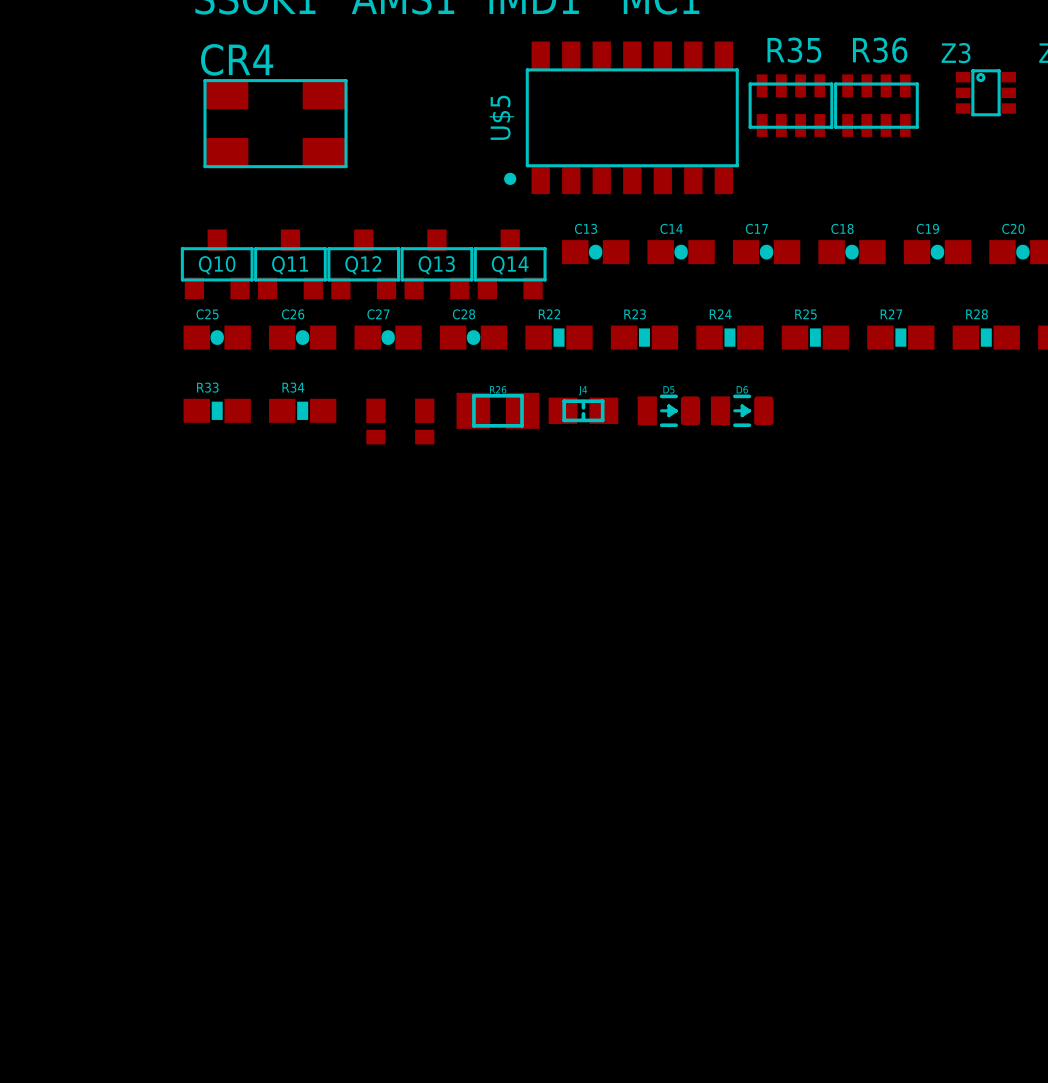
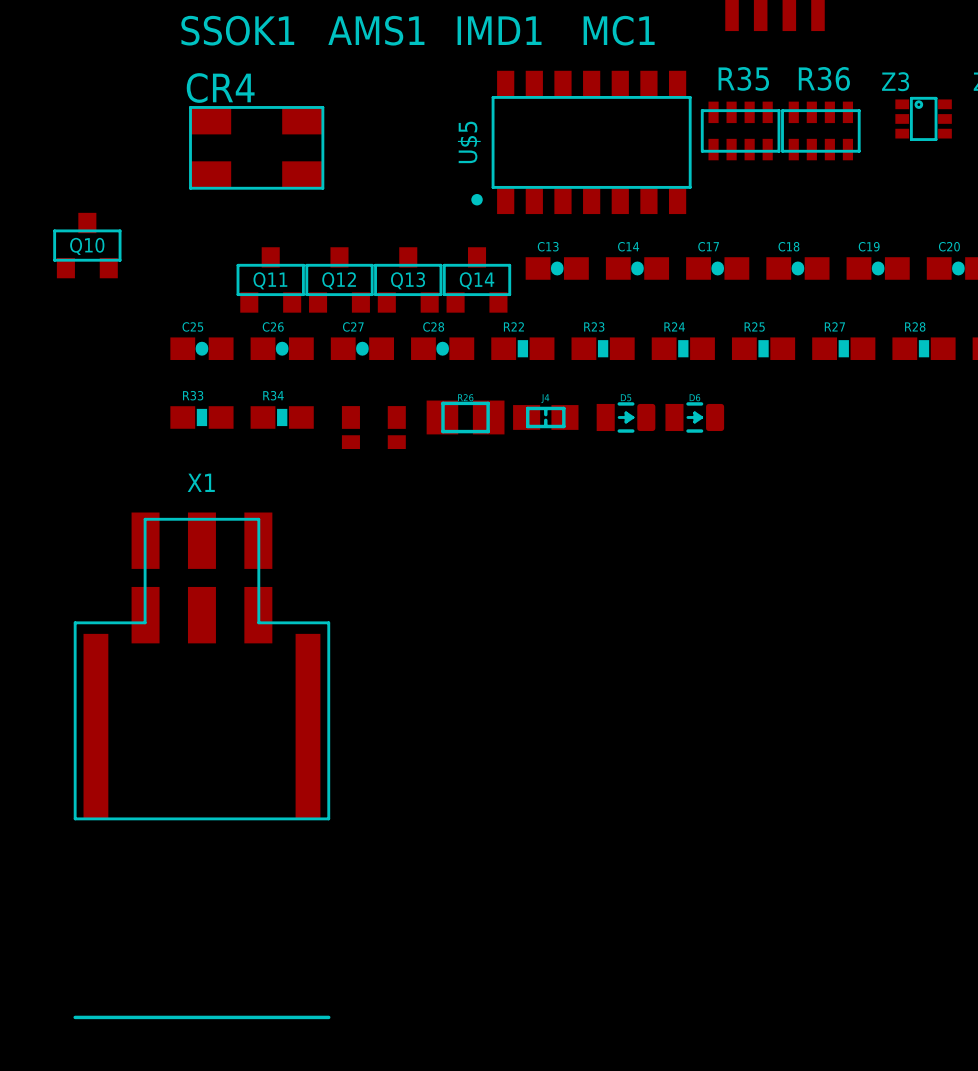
Q10 position: (217, 264) -> (87, 245)
X1: none -> (201, 765)

